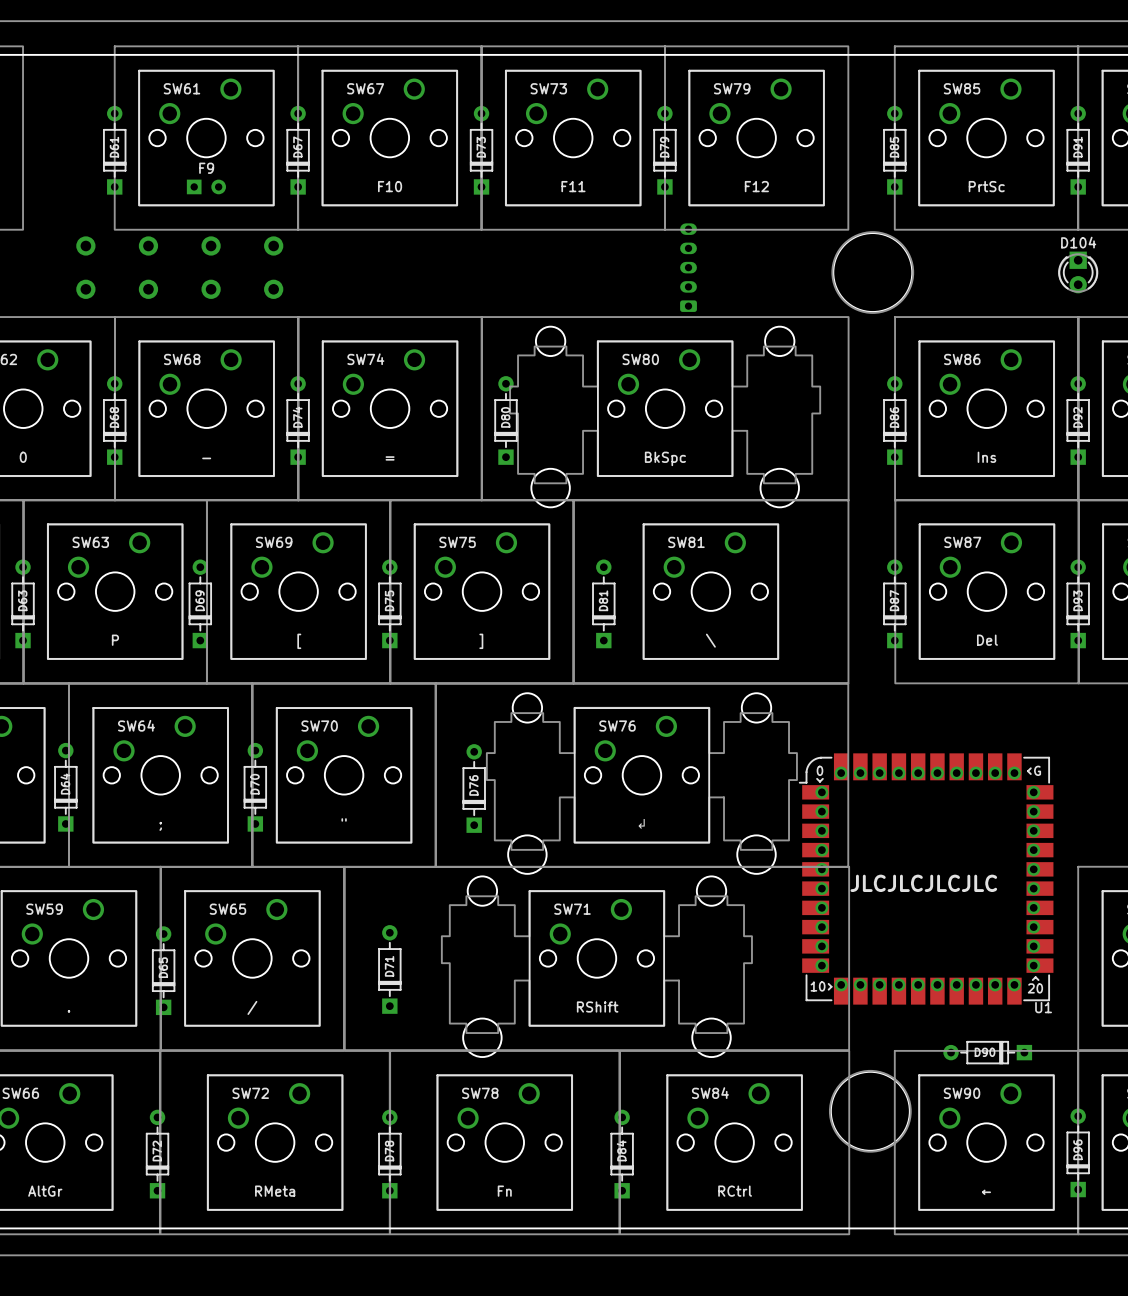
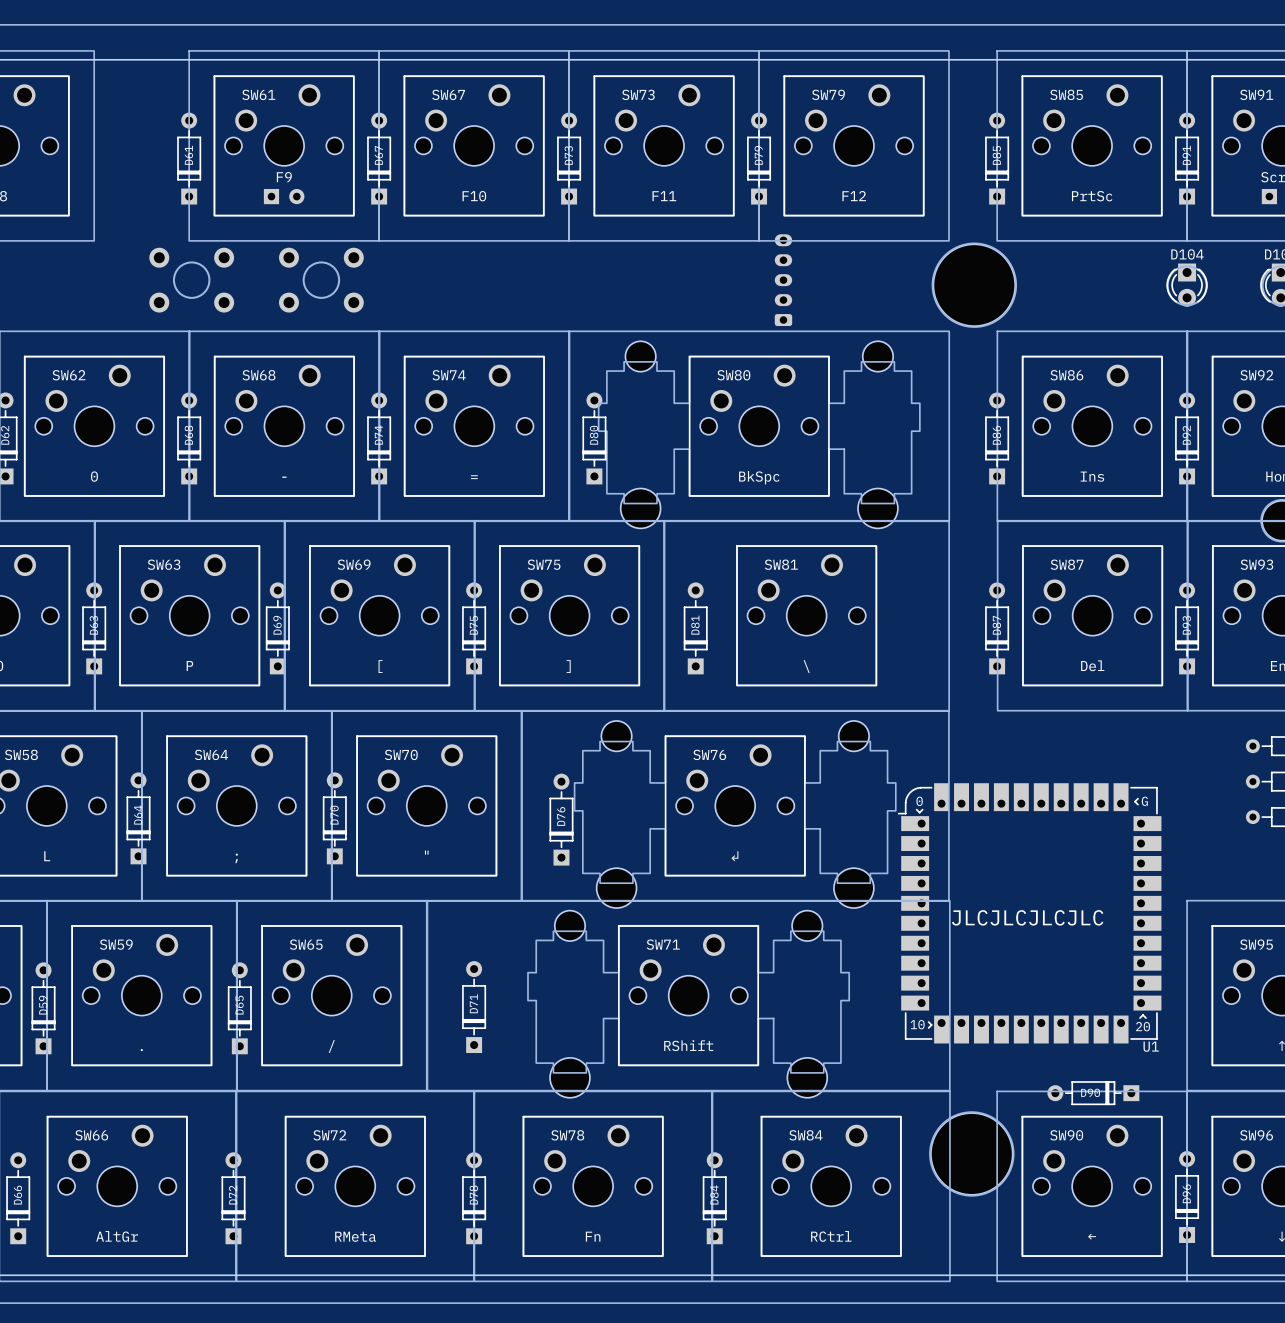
drawing: none -> [172, 261, 211, 299]
drawing: none -> [302, 261, 341, 299]

